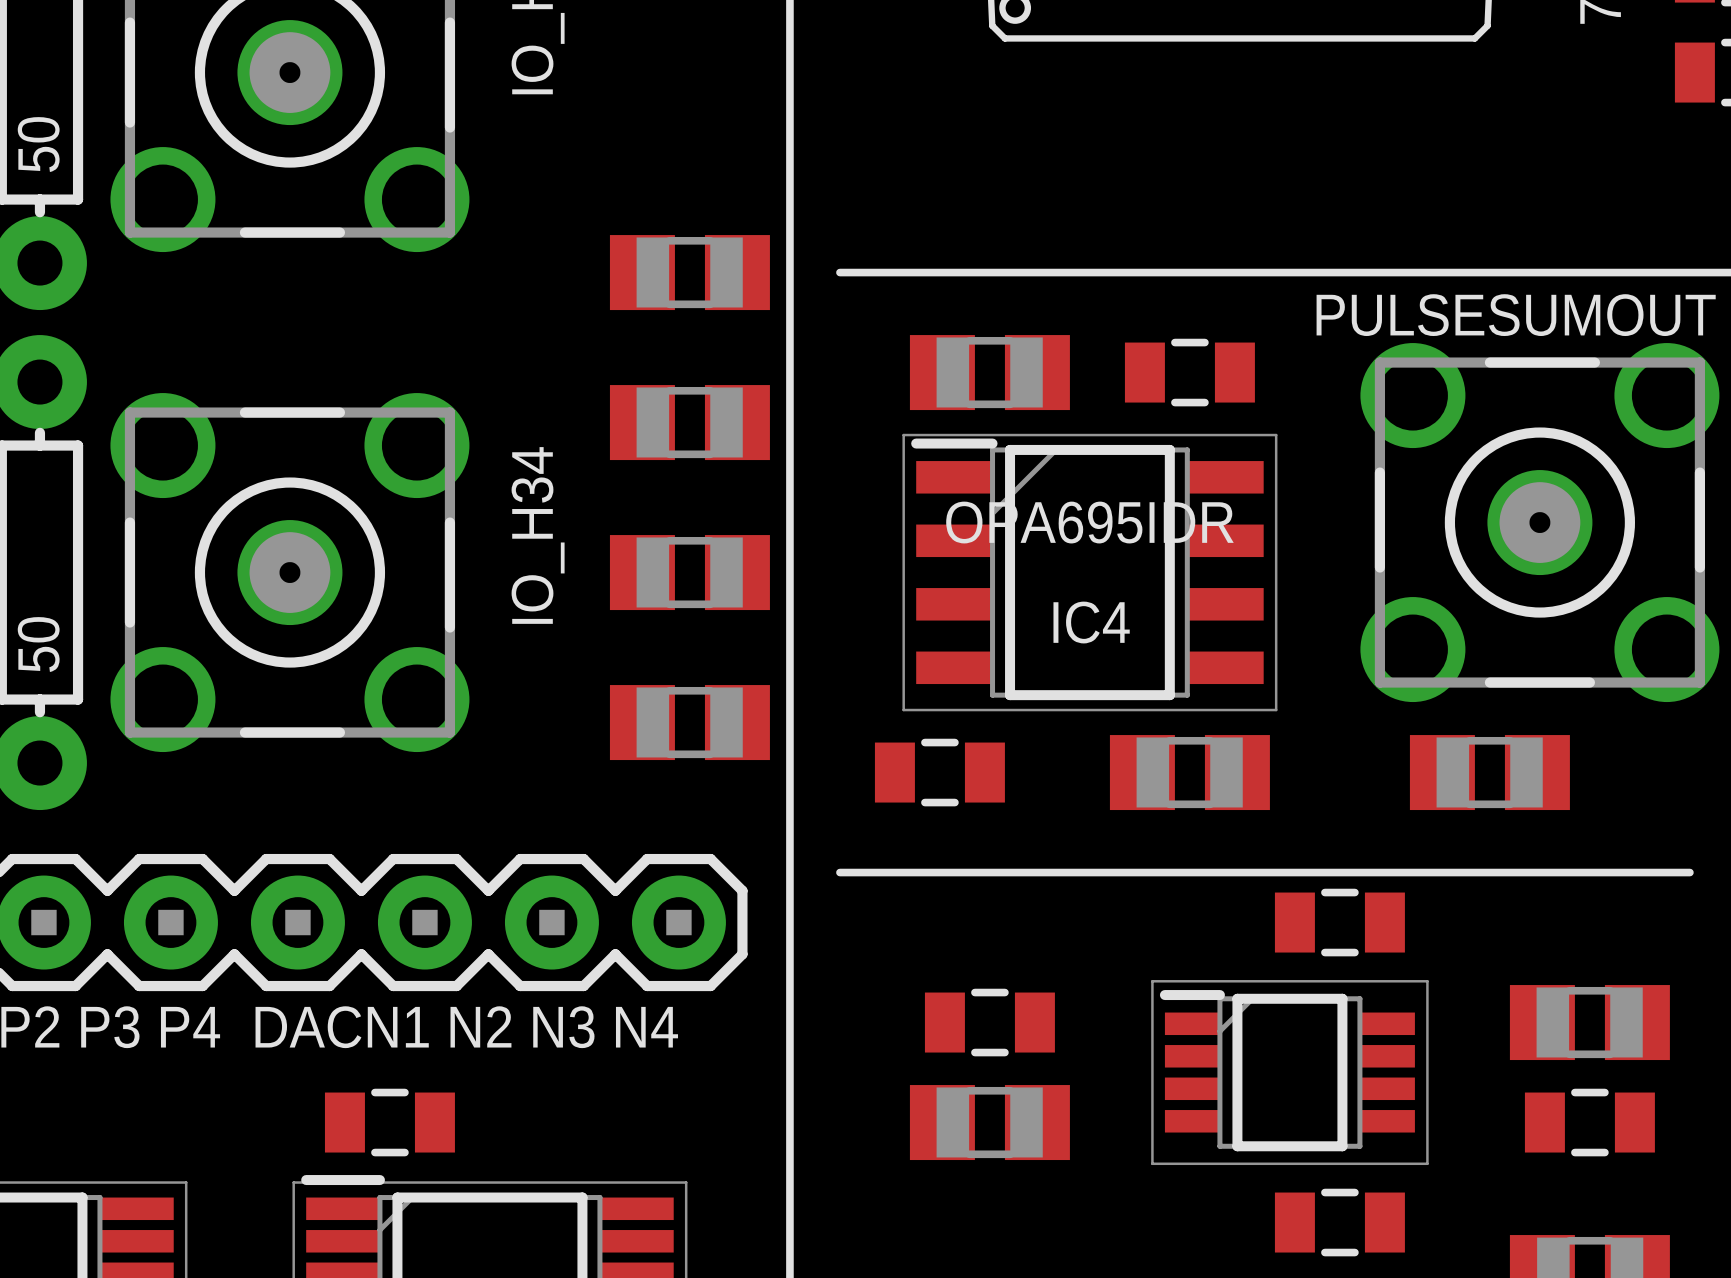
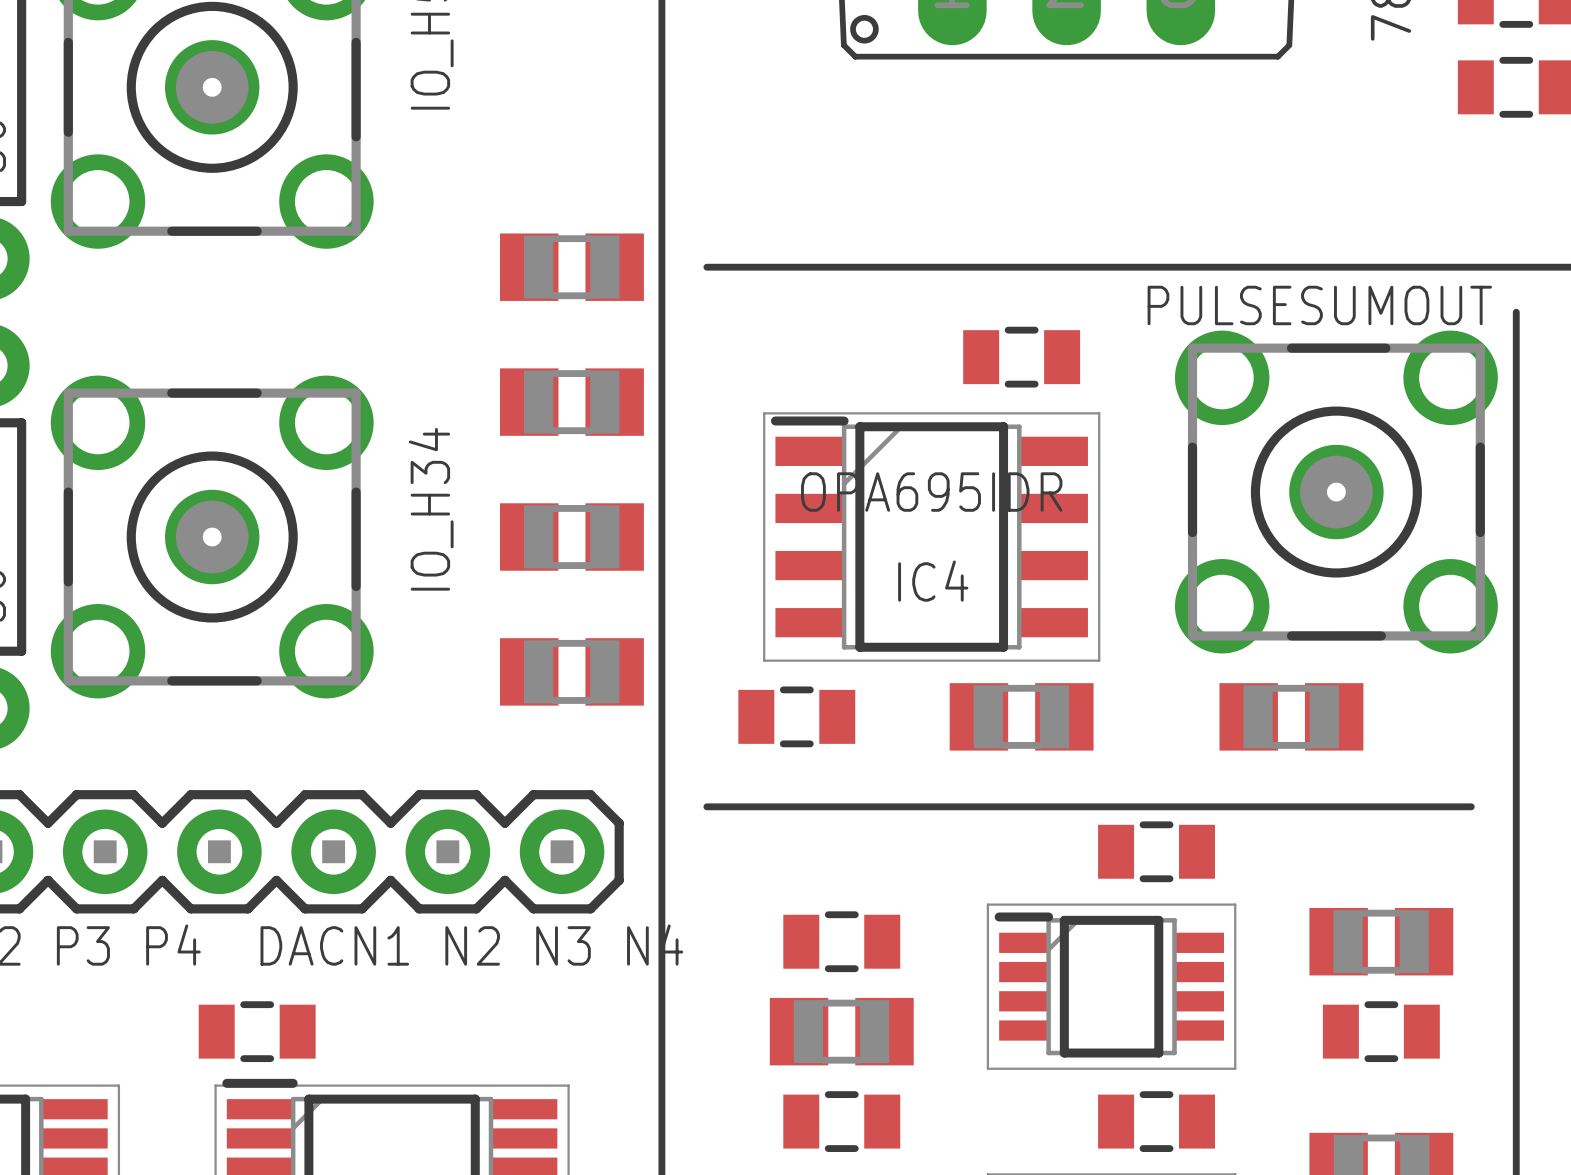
part: (989, 372) -> none
part position: (389, 1122) -> (257, 1031)
part: none -> (841, 1121)

